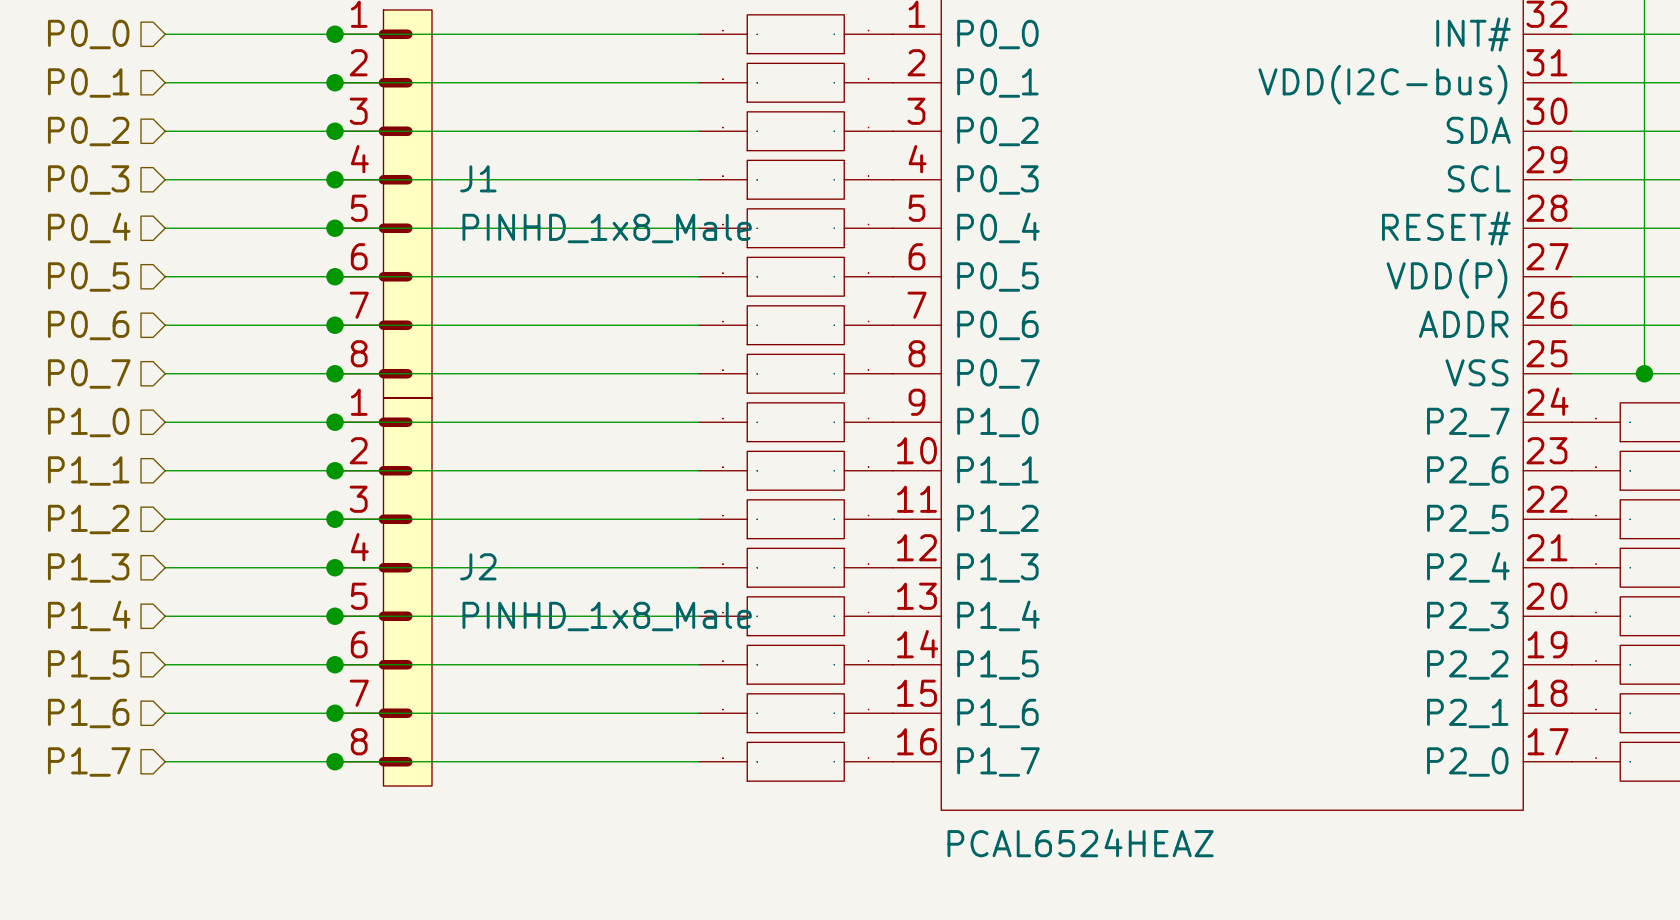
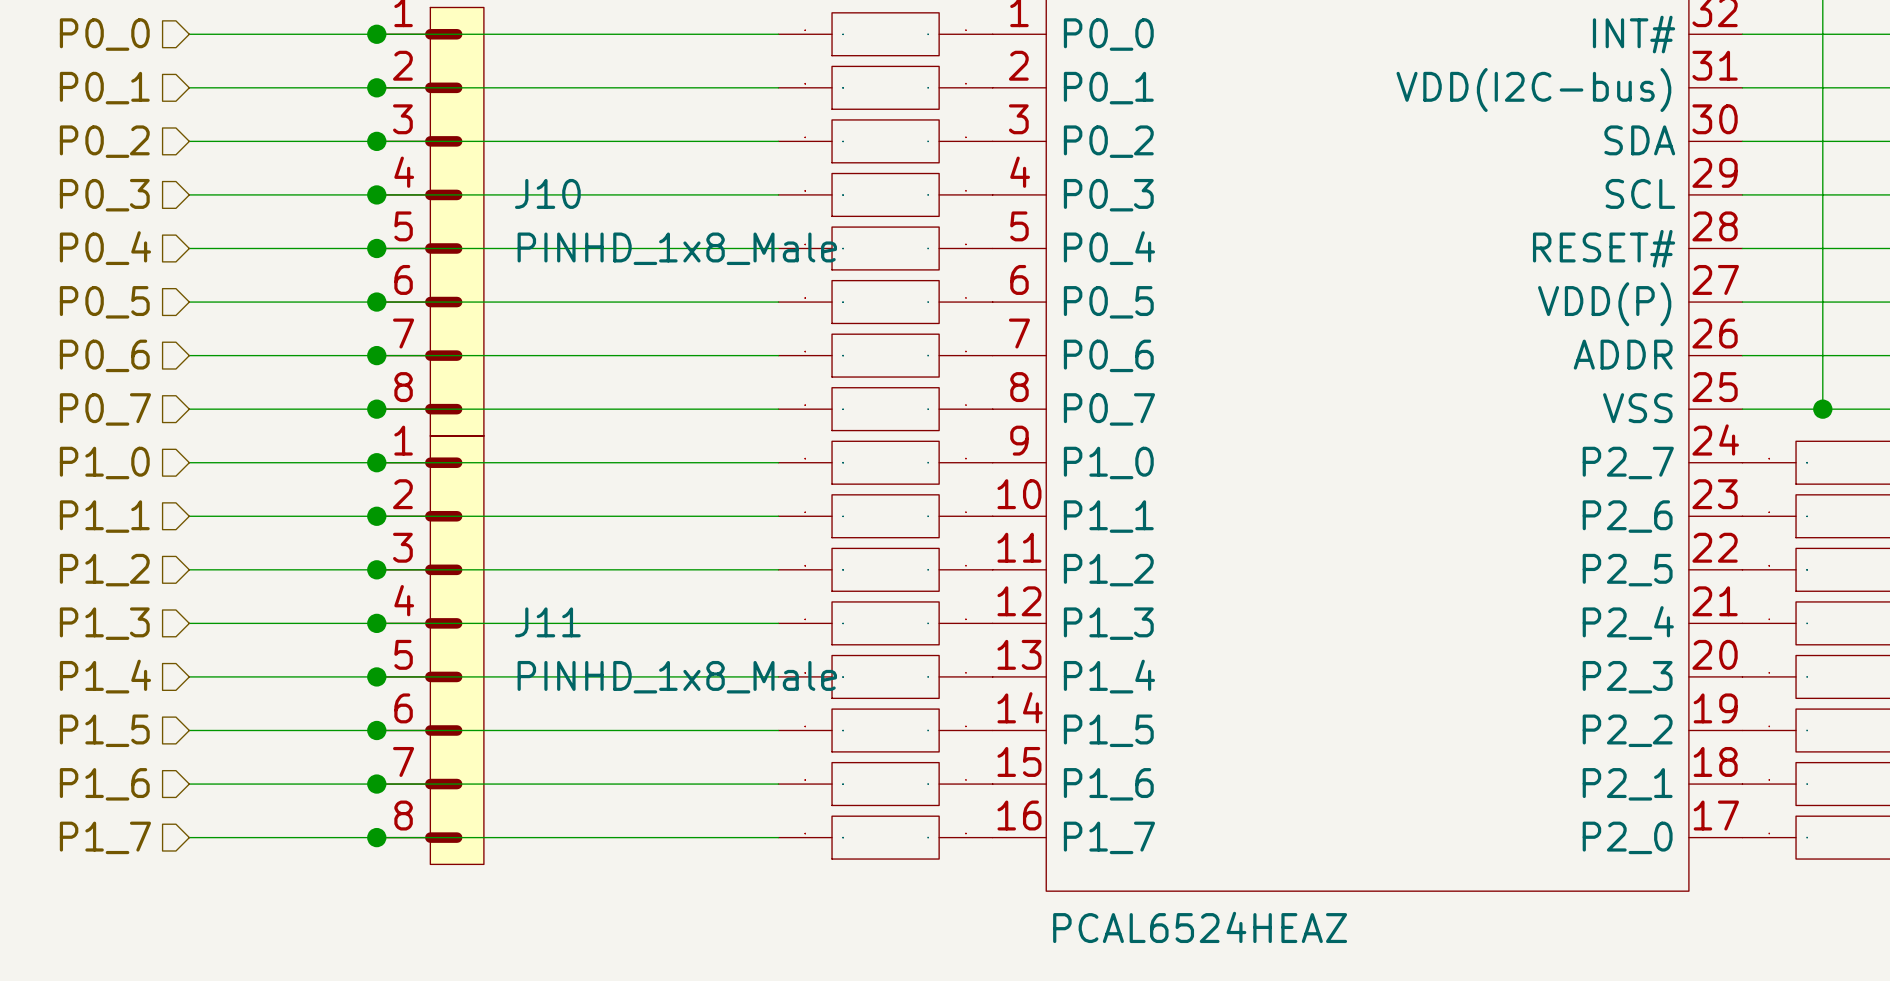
J1 name: J1 (478, 178) -> J10 (547, 193)
J2 name: J2 (478, 566) -> J11 (547, 622)

